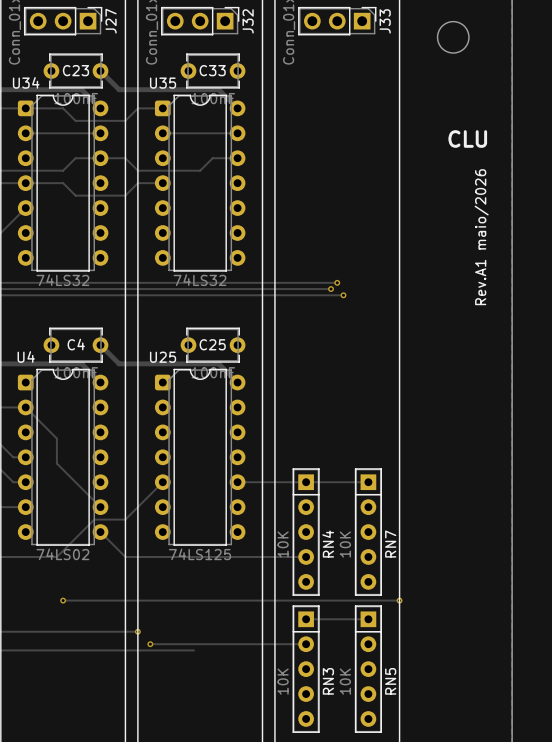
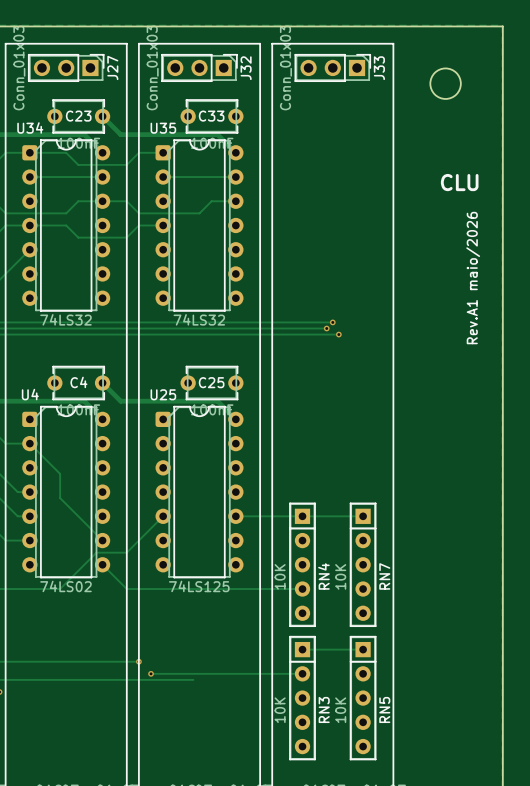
track: (63, 600) (399, 600) -> none
via: (63, 600) -> none
via: (399, 600) -> none

